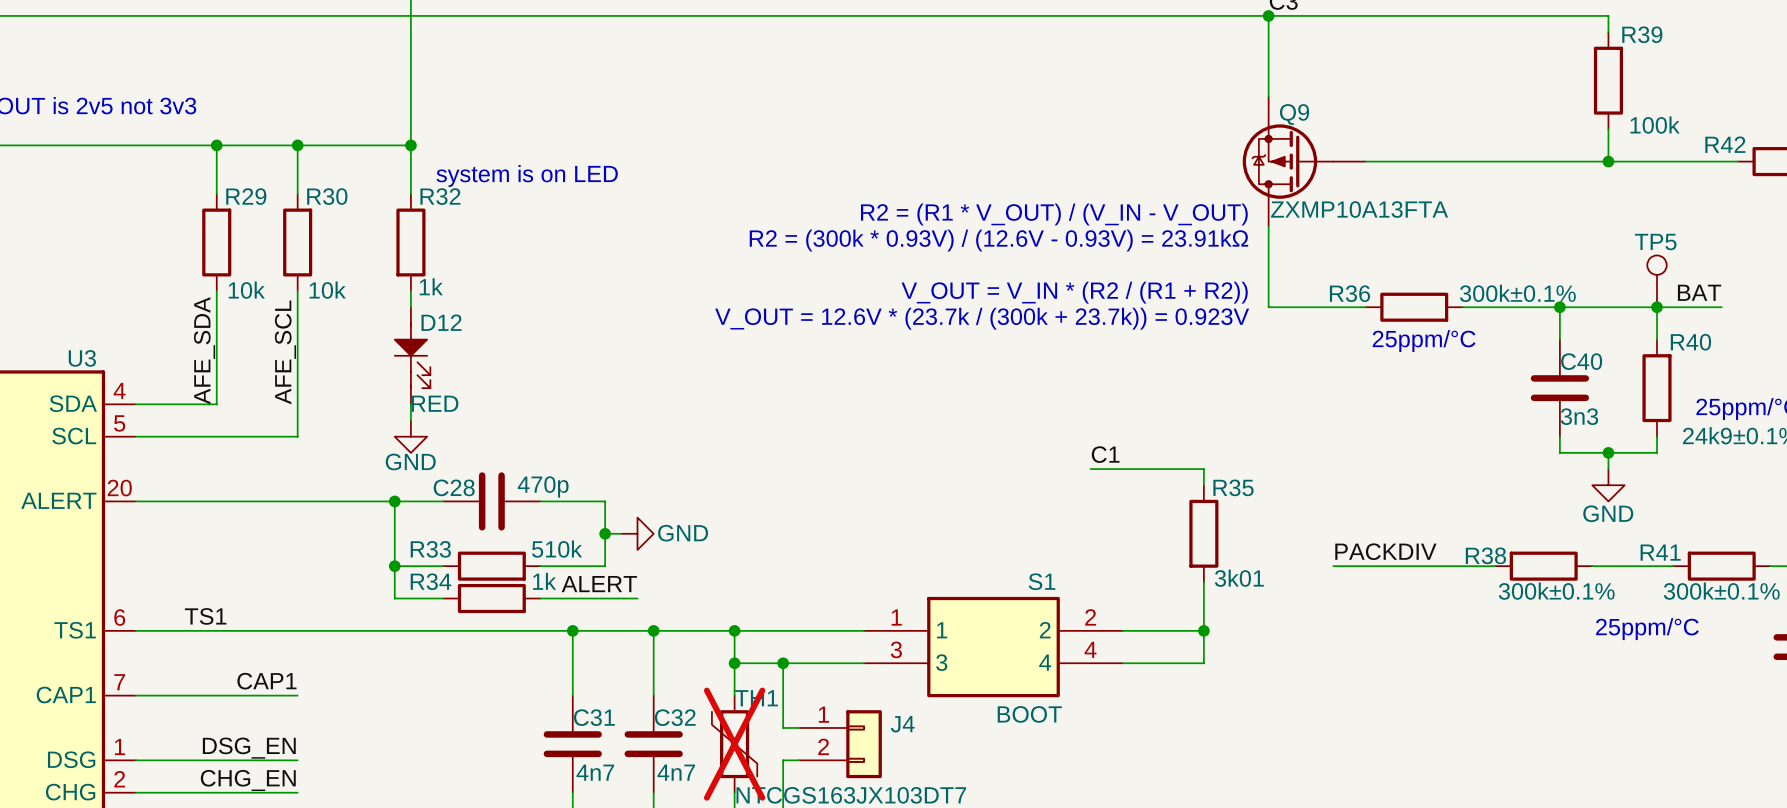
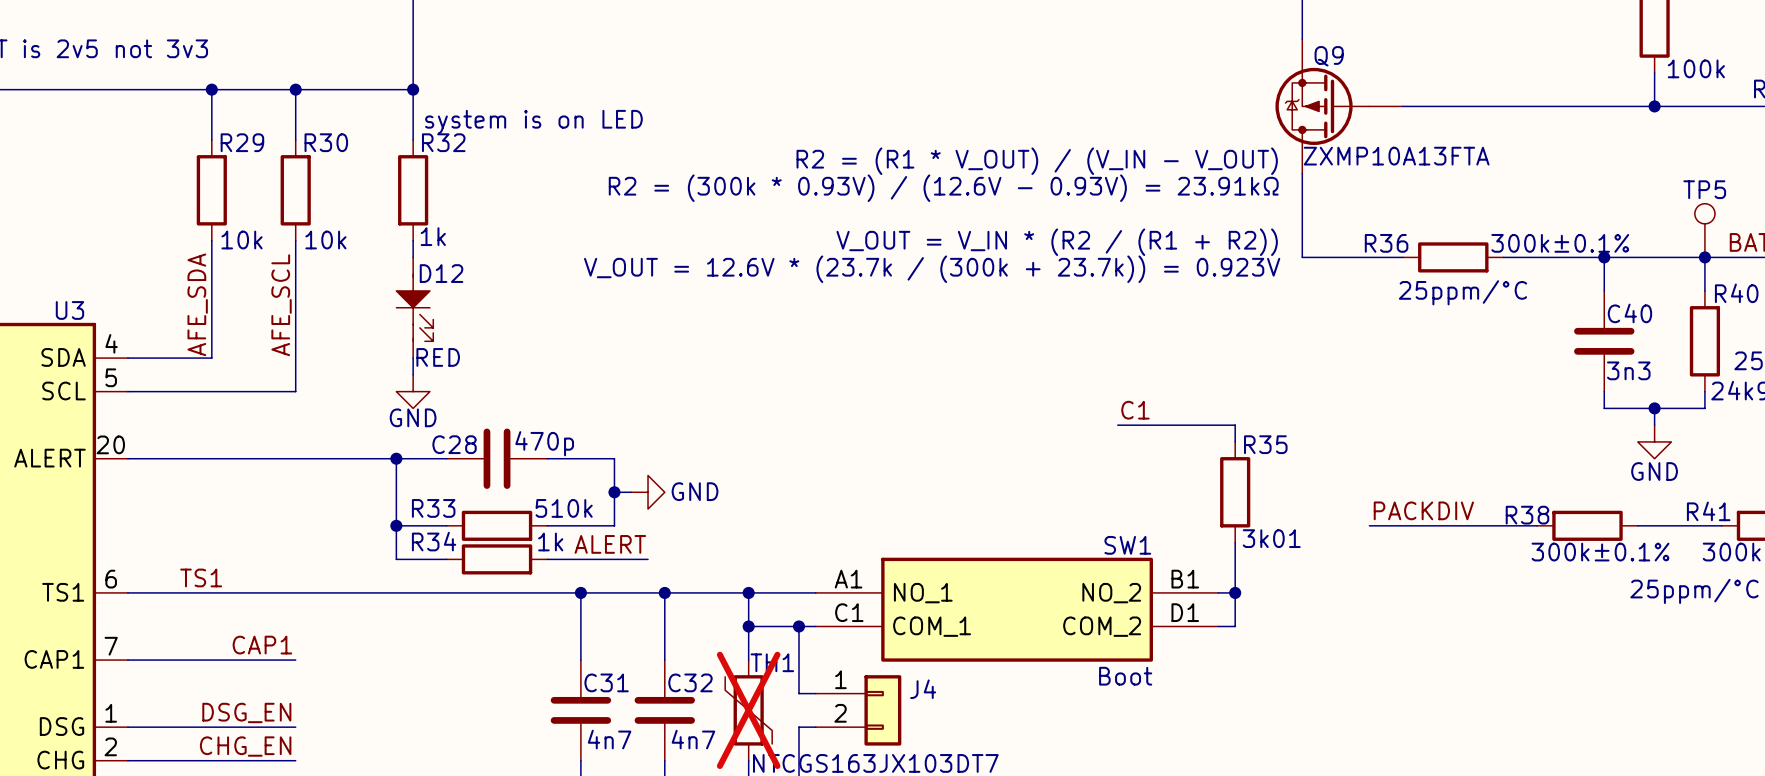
S1: BOOT (993, 647) -> none
SW1: none -> Boot (1017, 609)

